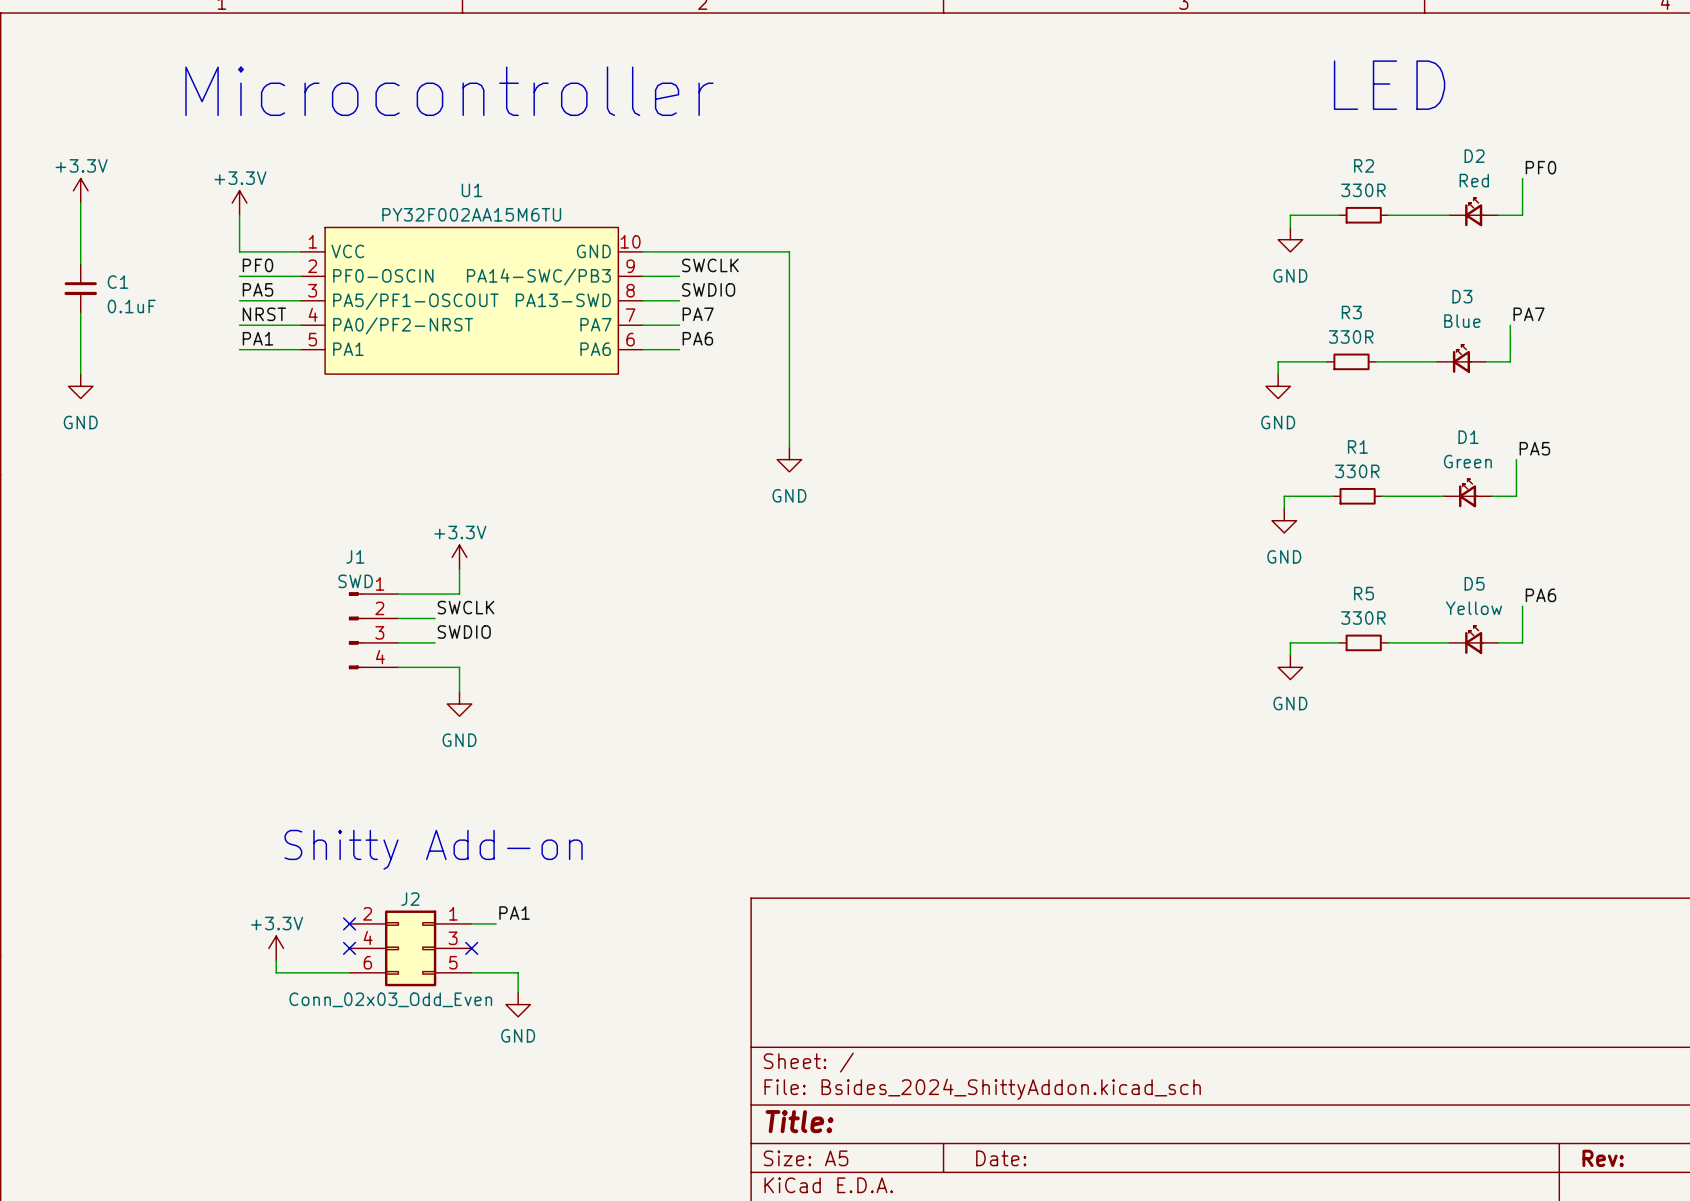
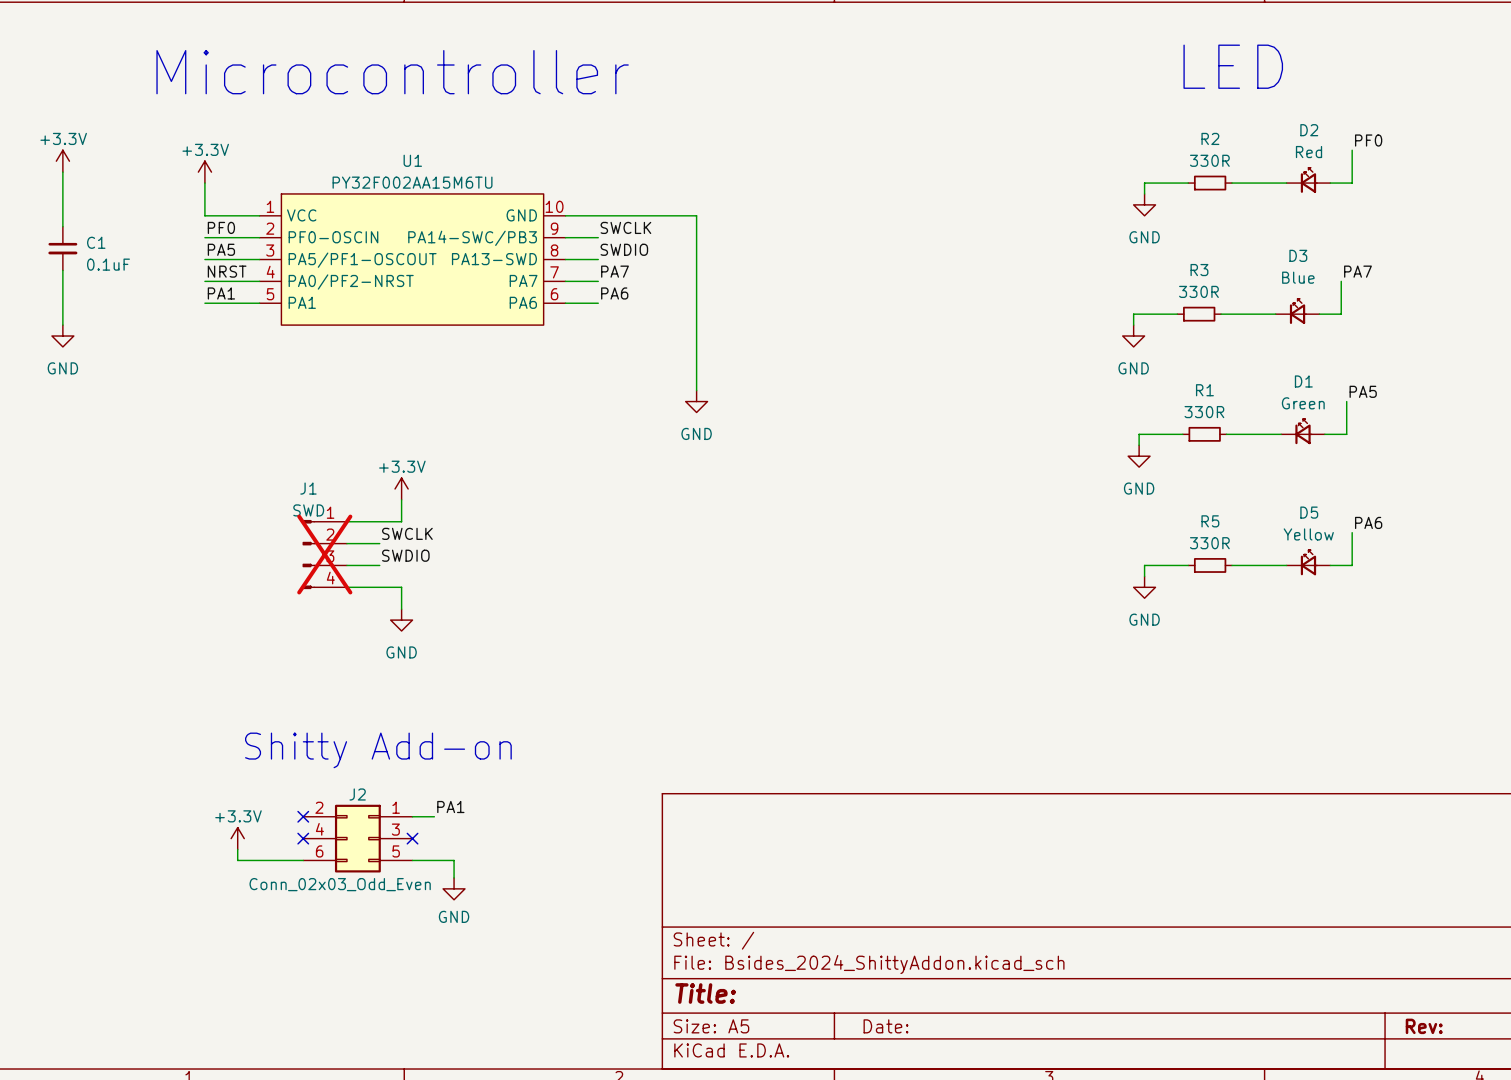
J1 do-not-place cross: none -> (324, 554)

